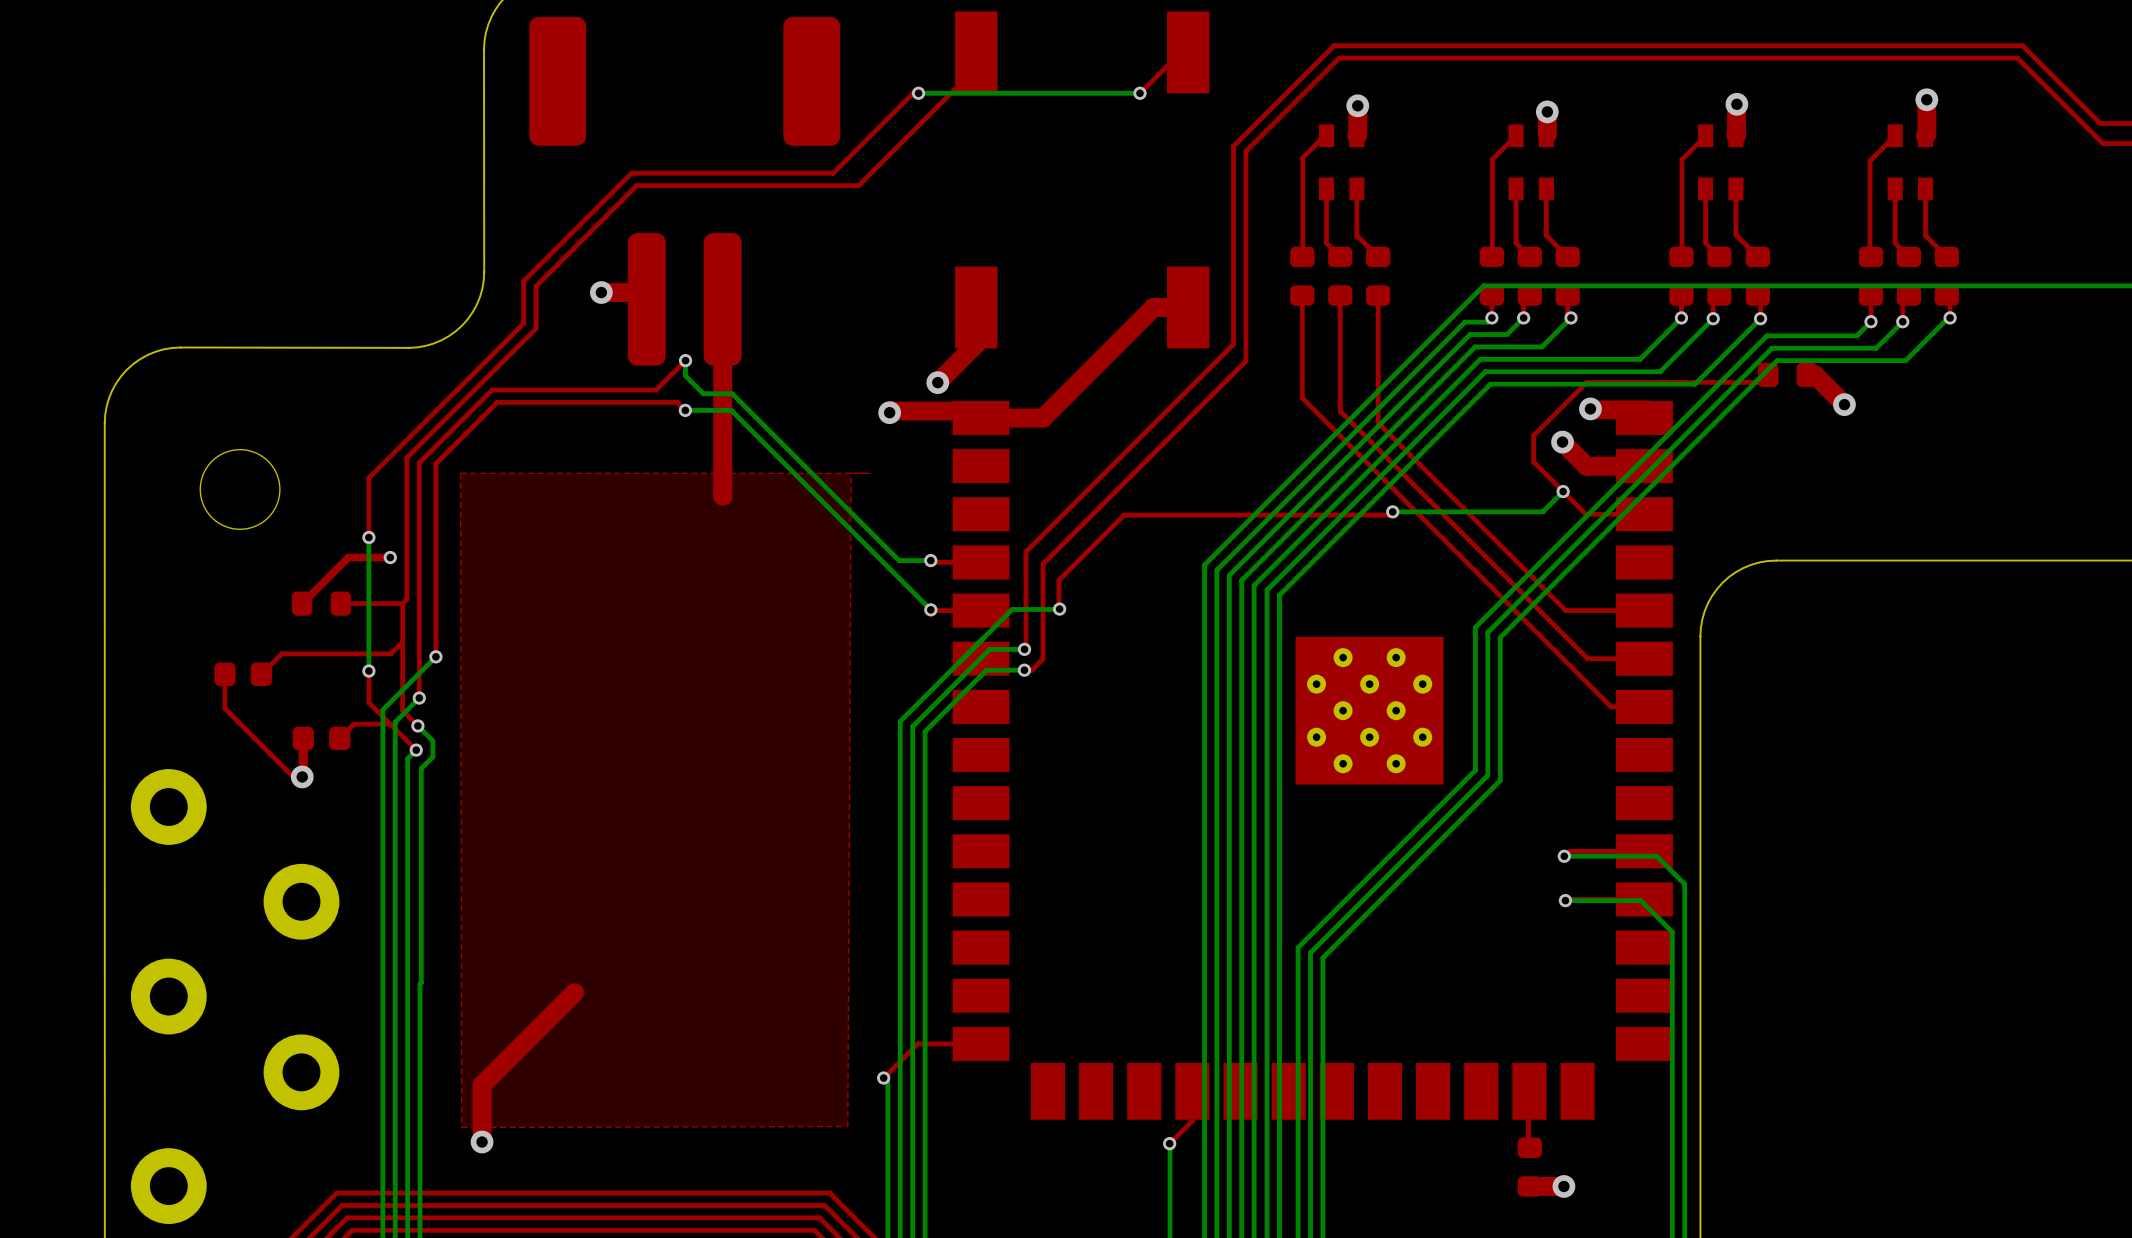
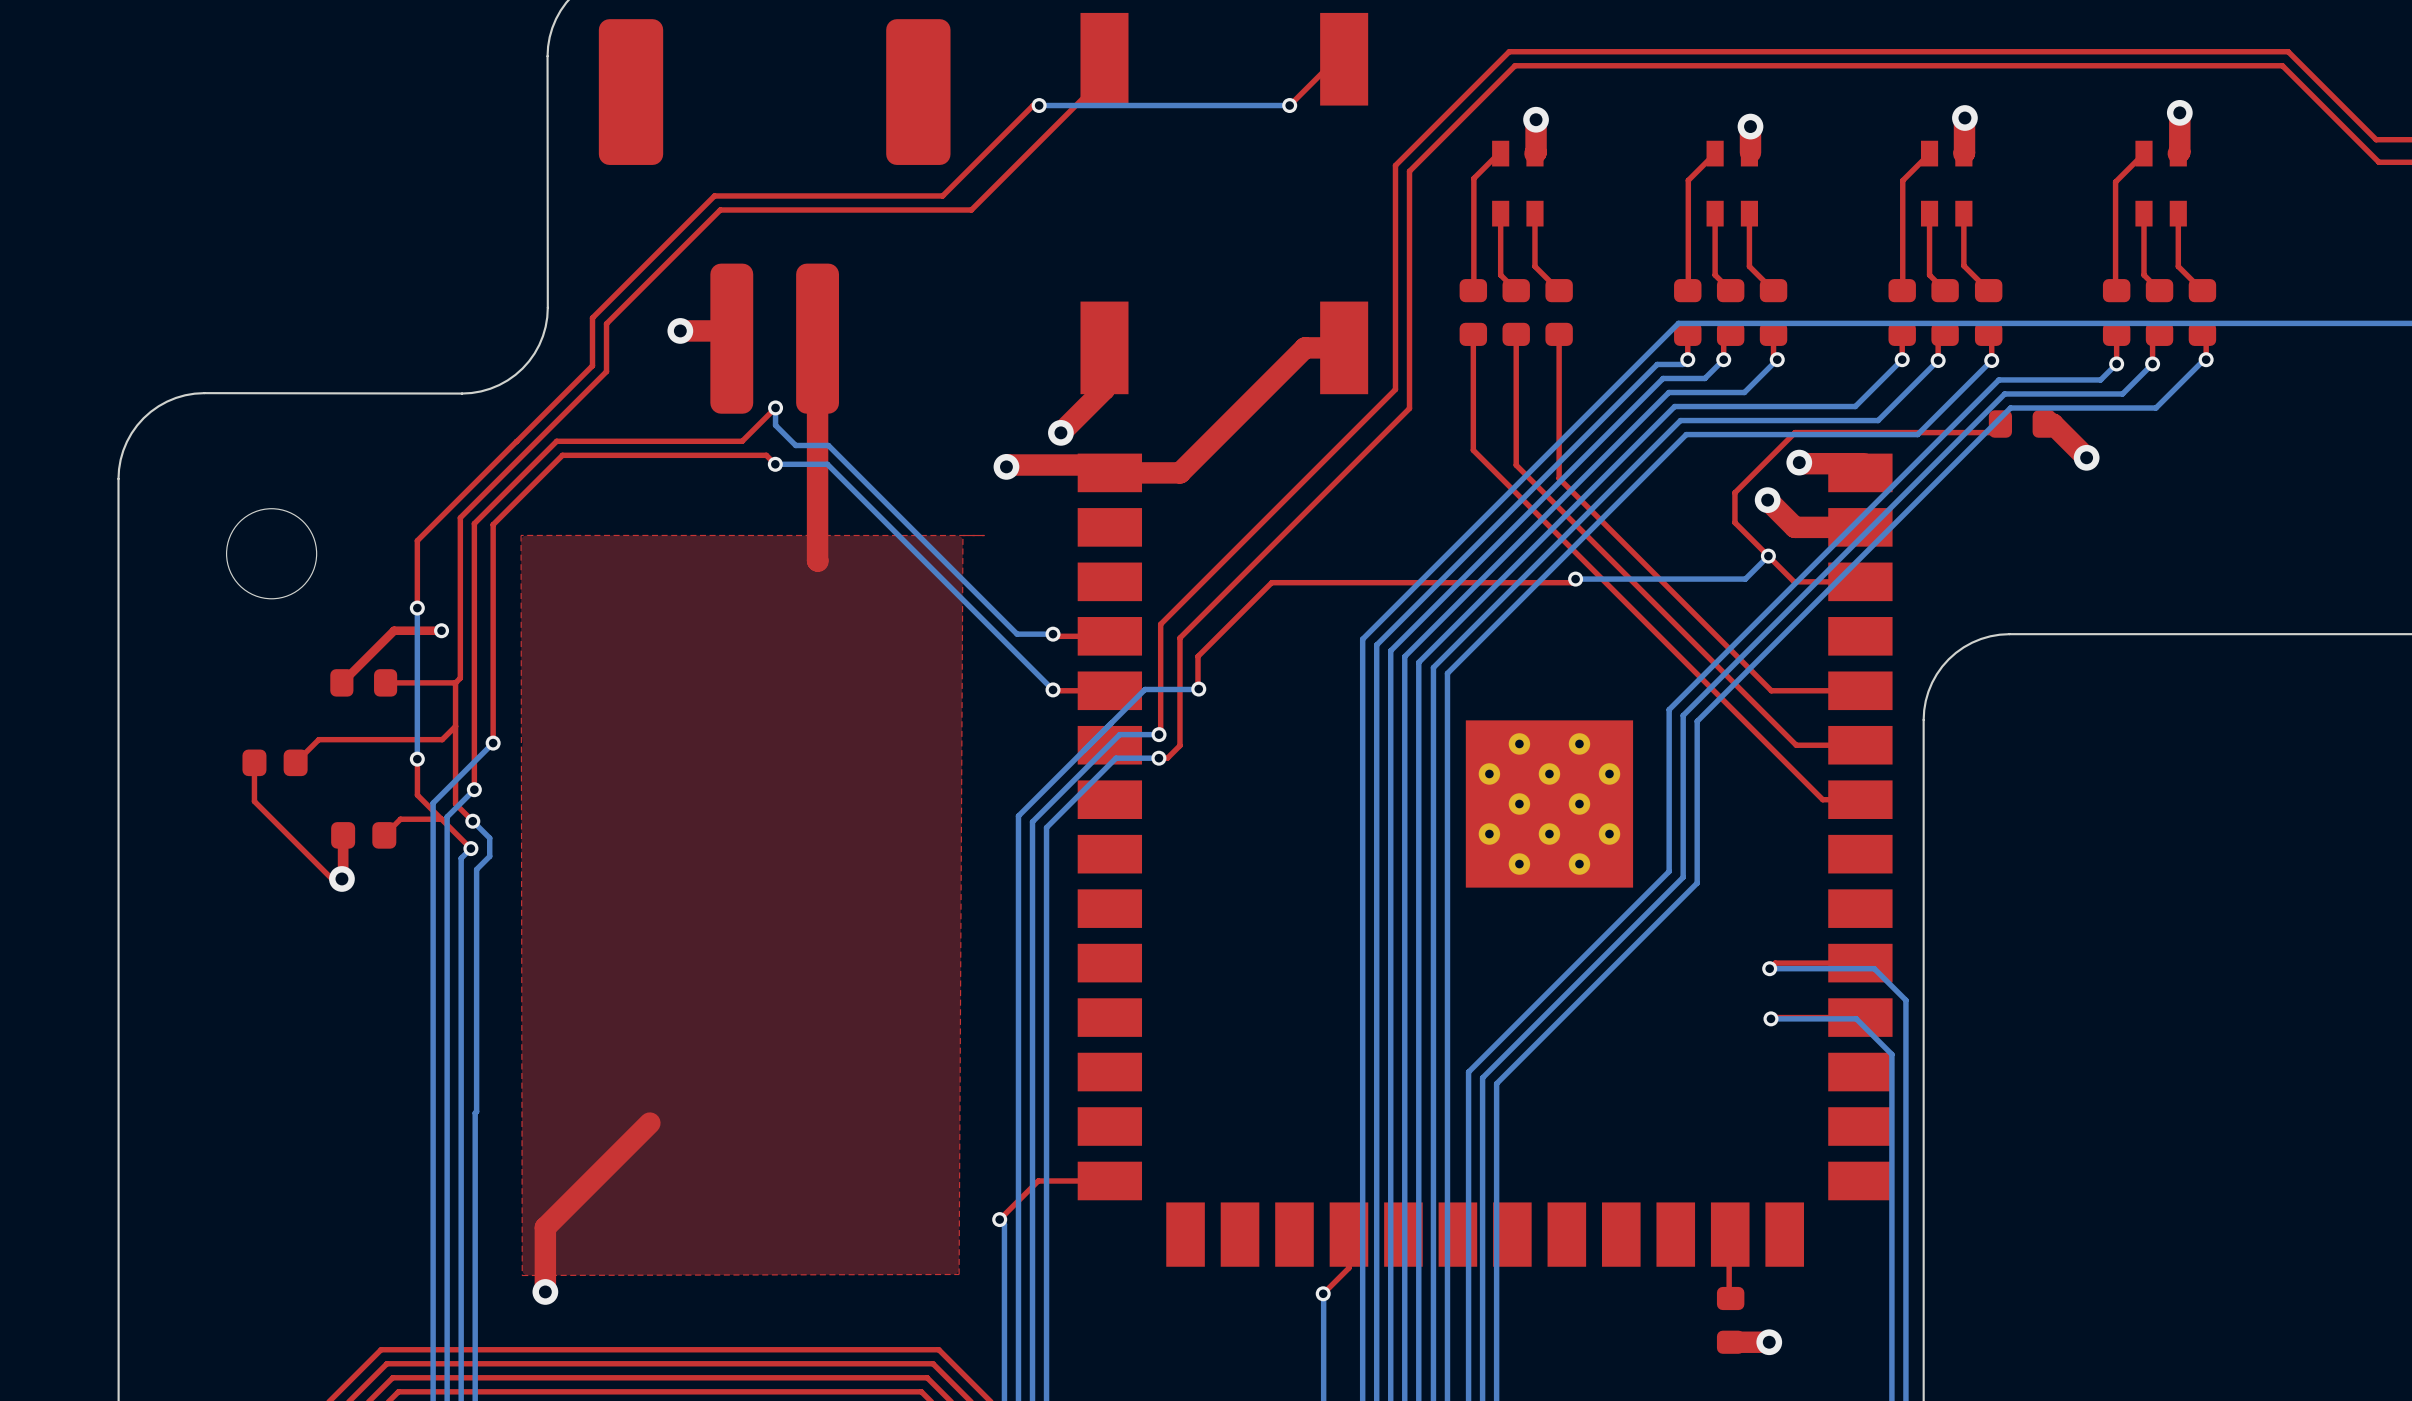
part: (168, 806) -> none
part: (301, 901) -> none
part: (168, 996) -> none
part: (301, 1072) -> none
part: (168, 1186) -> none

